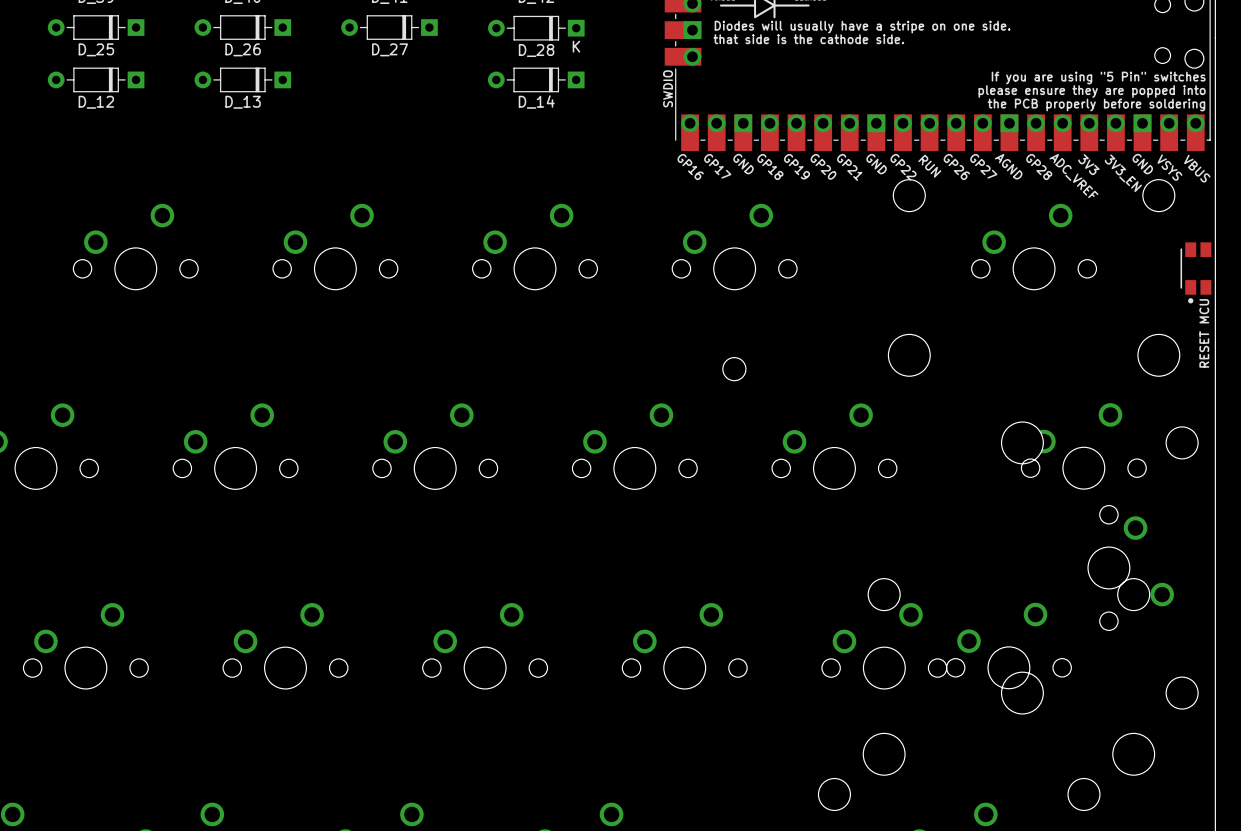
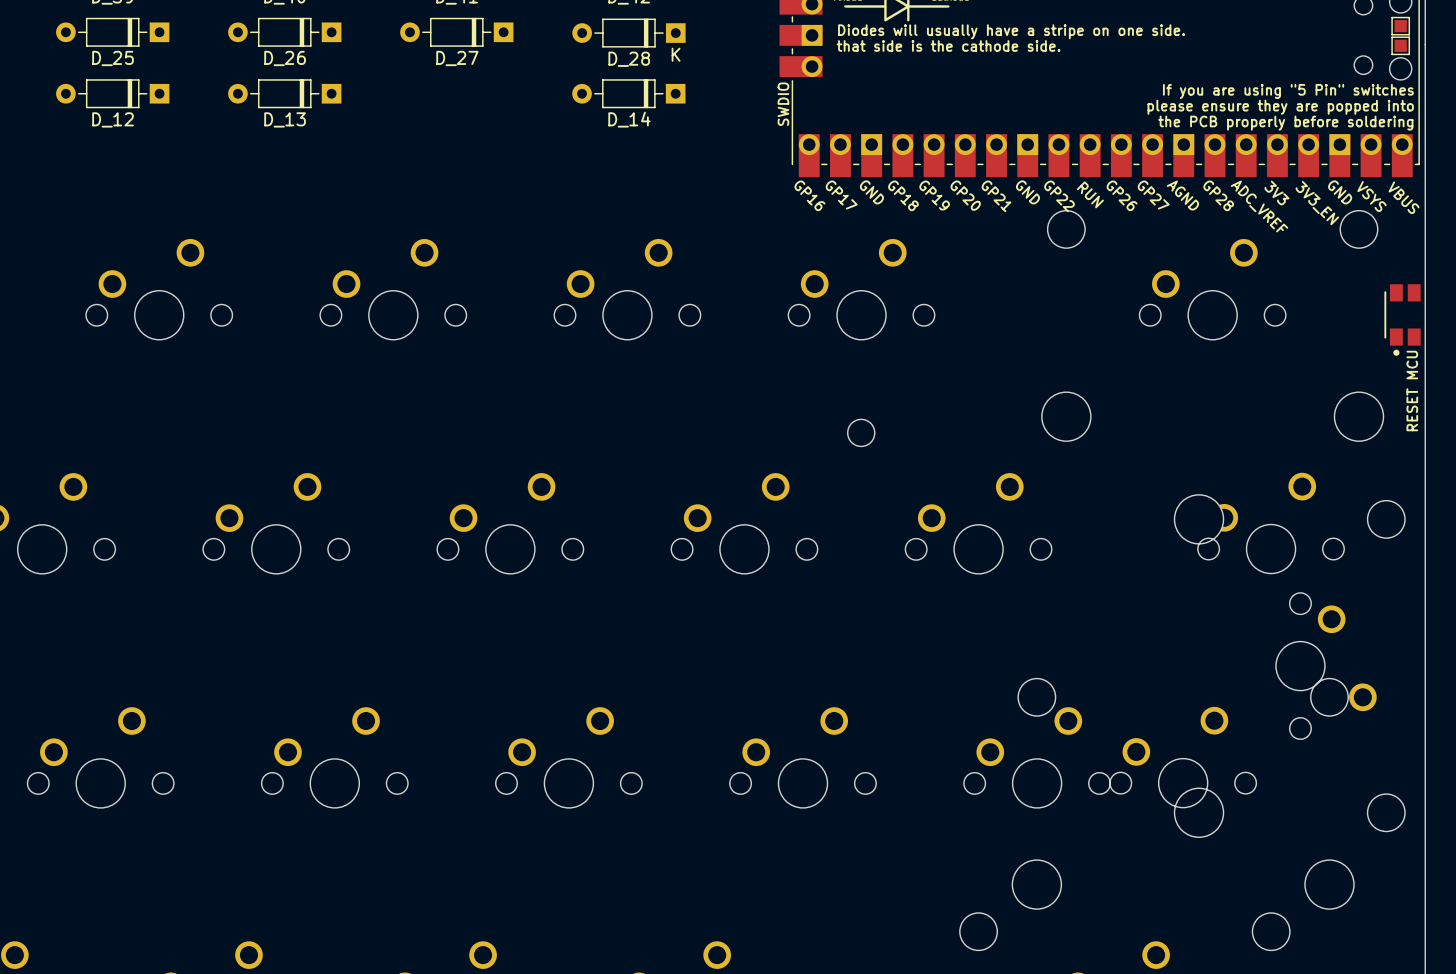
part: none -> (1400, 26)
part: none -> (1400, 45)

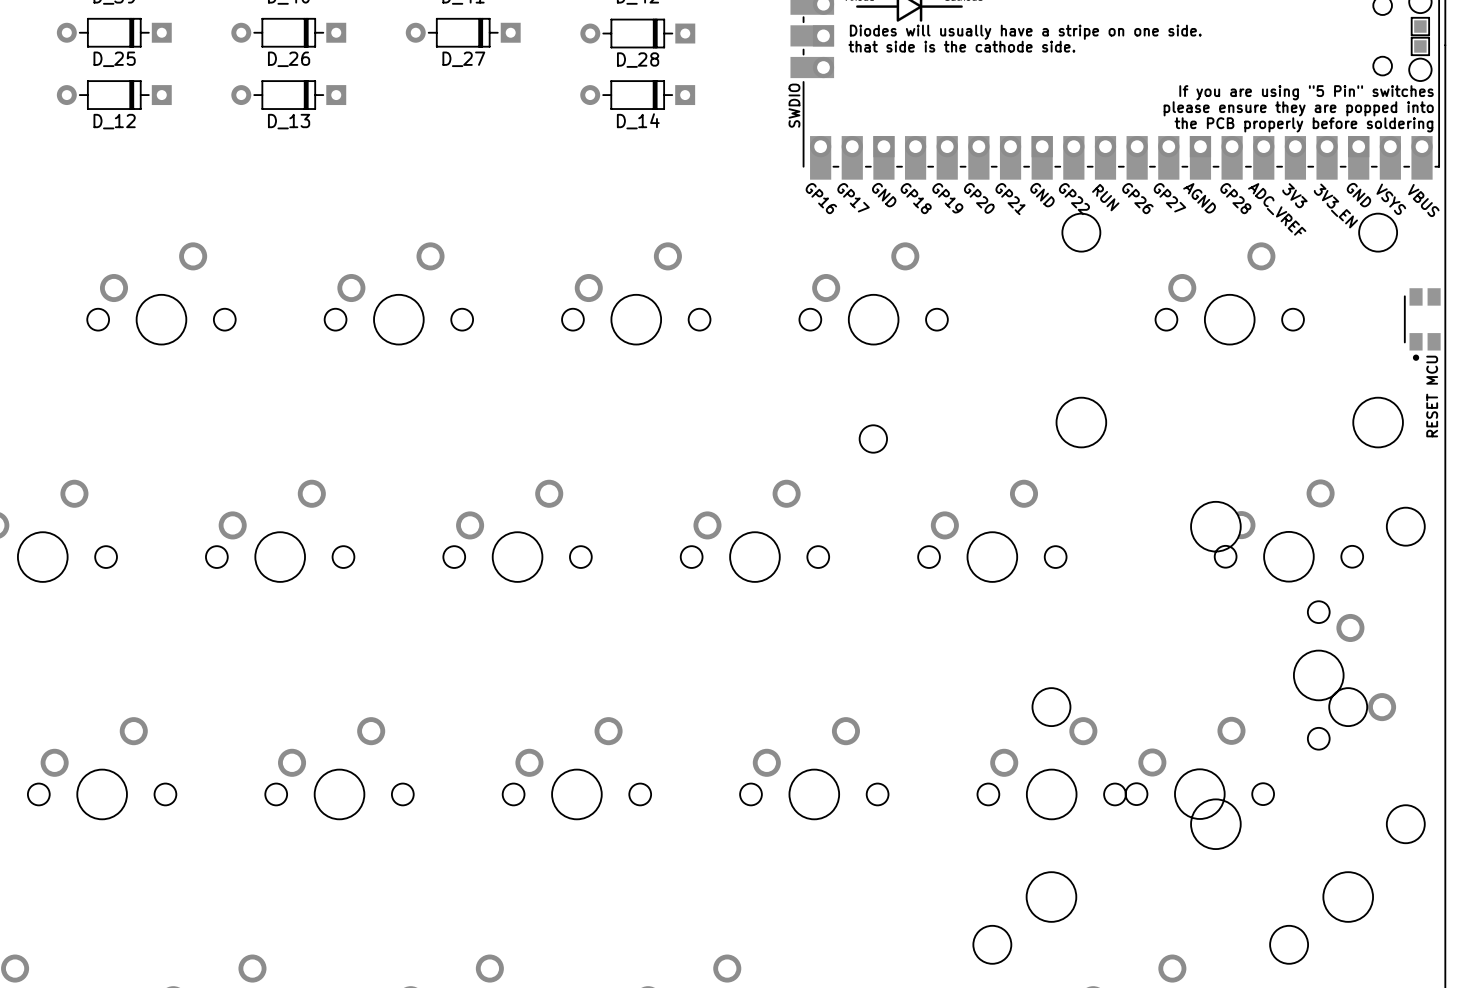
D_28 text: K (676, 54) -> none

